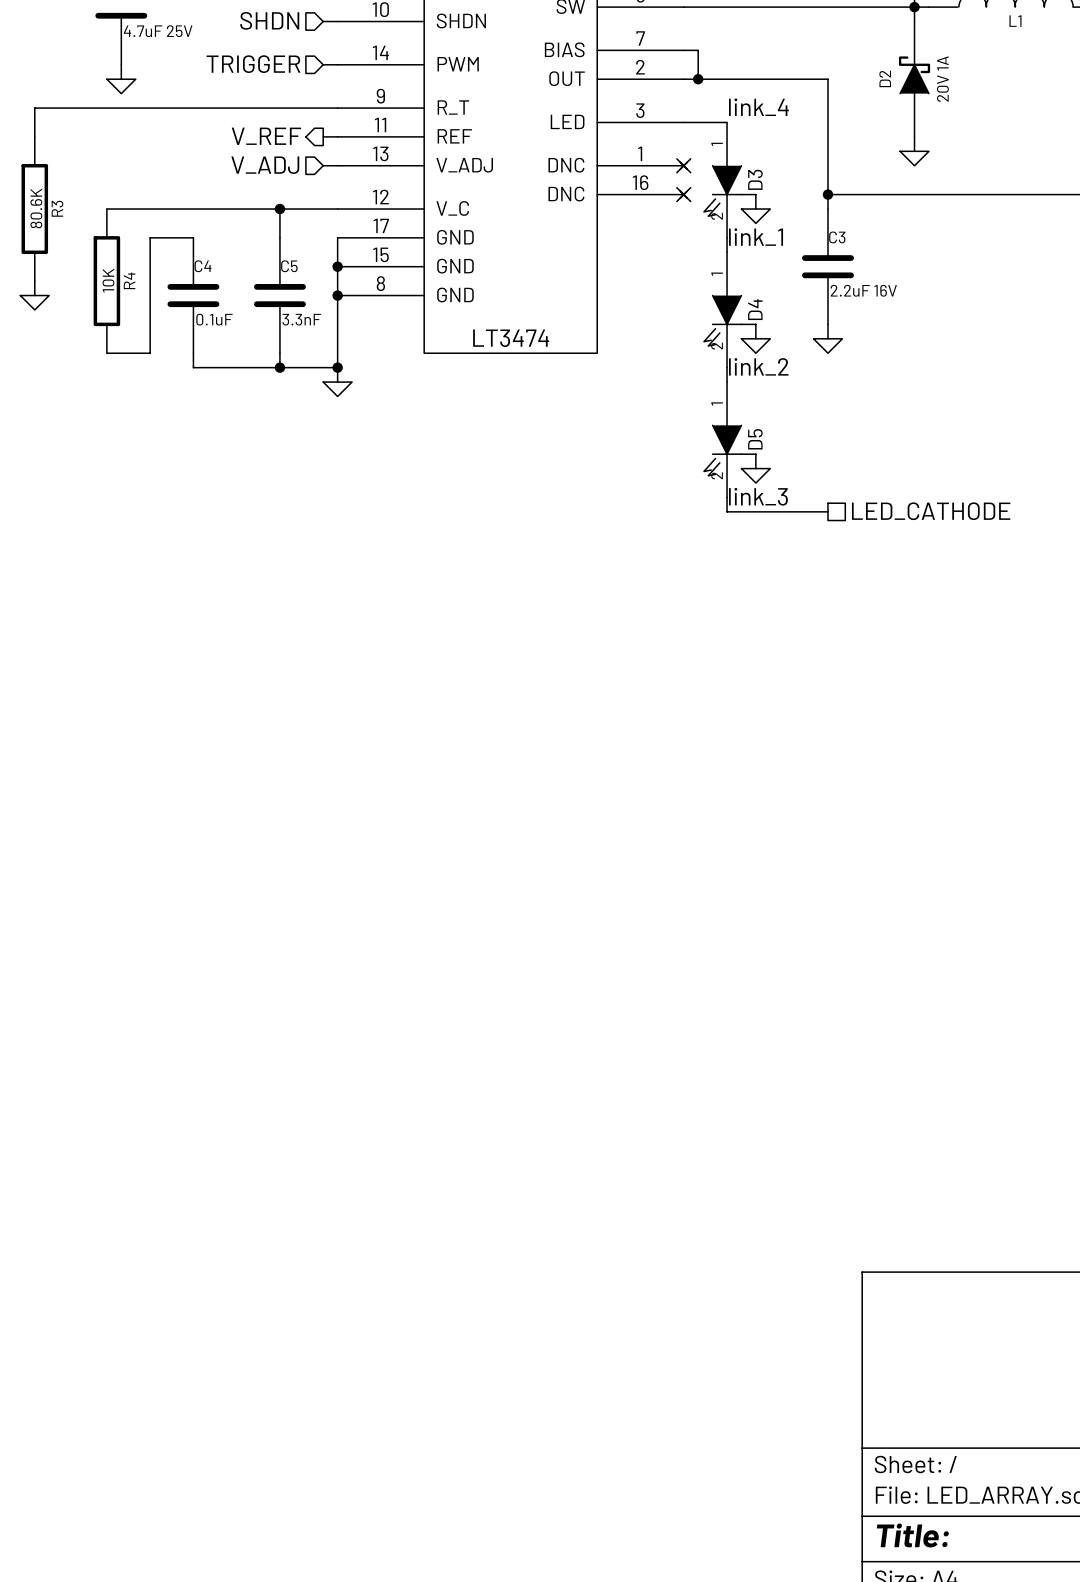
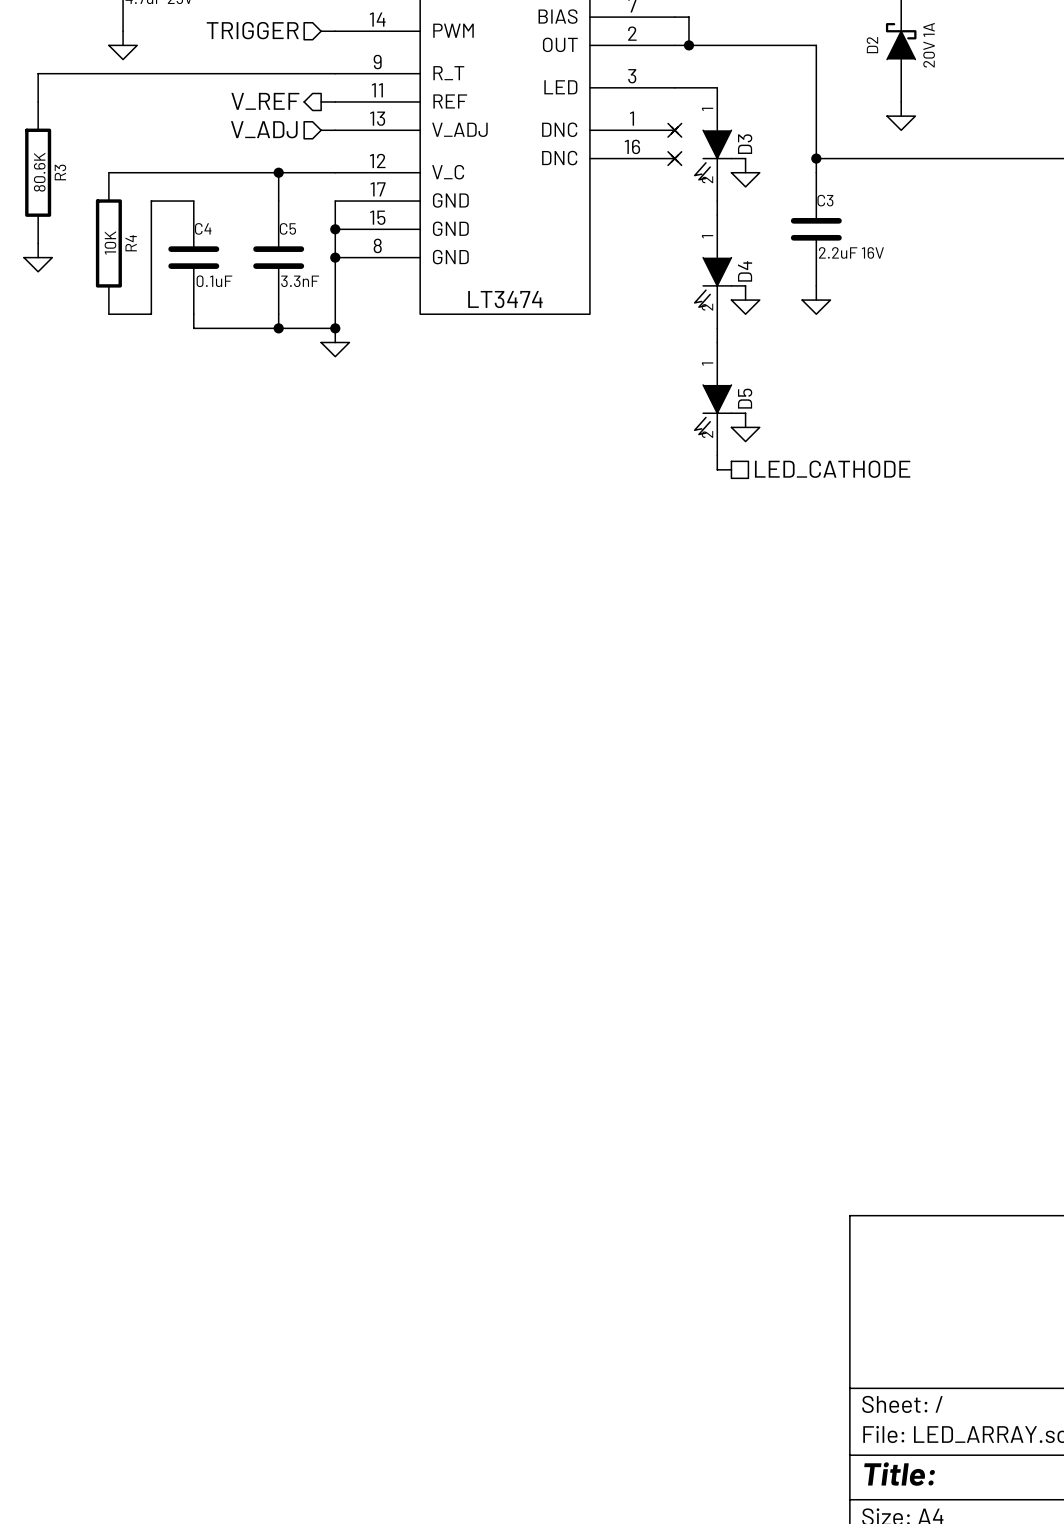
label: link_4 (758, 107) -> none
label: link_1 (756, 237) -> none
label: link_2 (758, 366) -> none
label: link_3 (758, 496) -> none
wire: (741, 511) (827, 511) -> none
hierarchical label position: LED_CATHODE (931, 511) -> LED_CATHODE (832, 469)

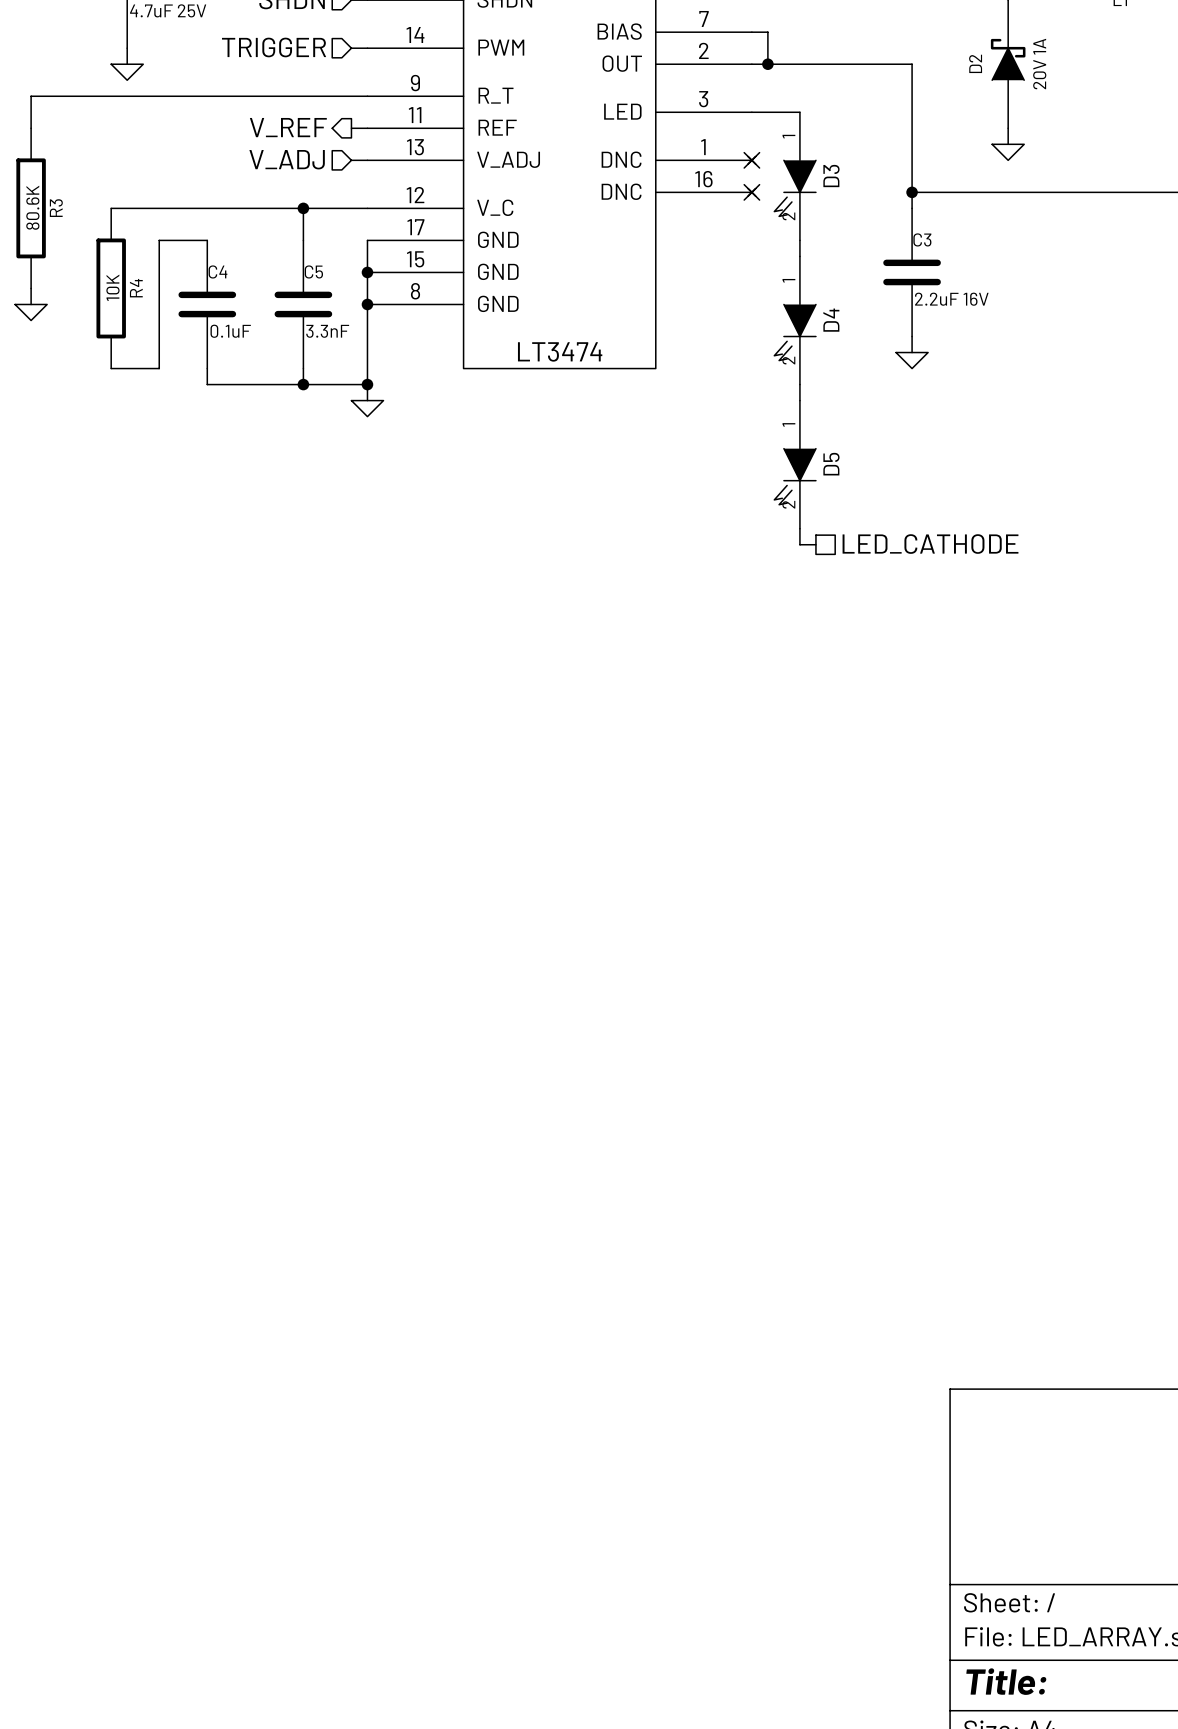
wire: (731, 158) (745, 158) (745, 172) -> none
power symbol: (745, 179) -> none
wire: (731, 285) (745, 285) (745, 300) -> none
power symbol: (745, 307) -> none
wire: (731, 413) (745, 413) (745, 427) -> none
power symbol: (745, 434) -> none

